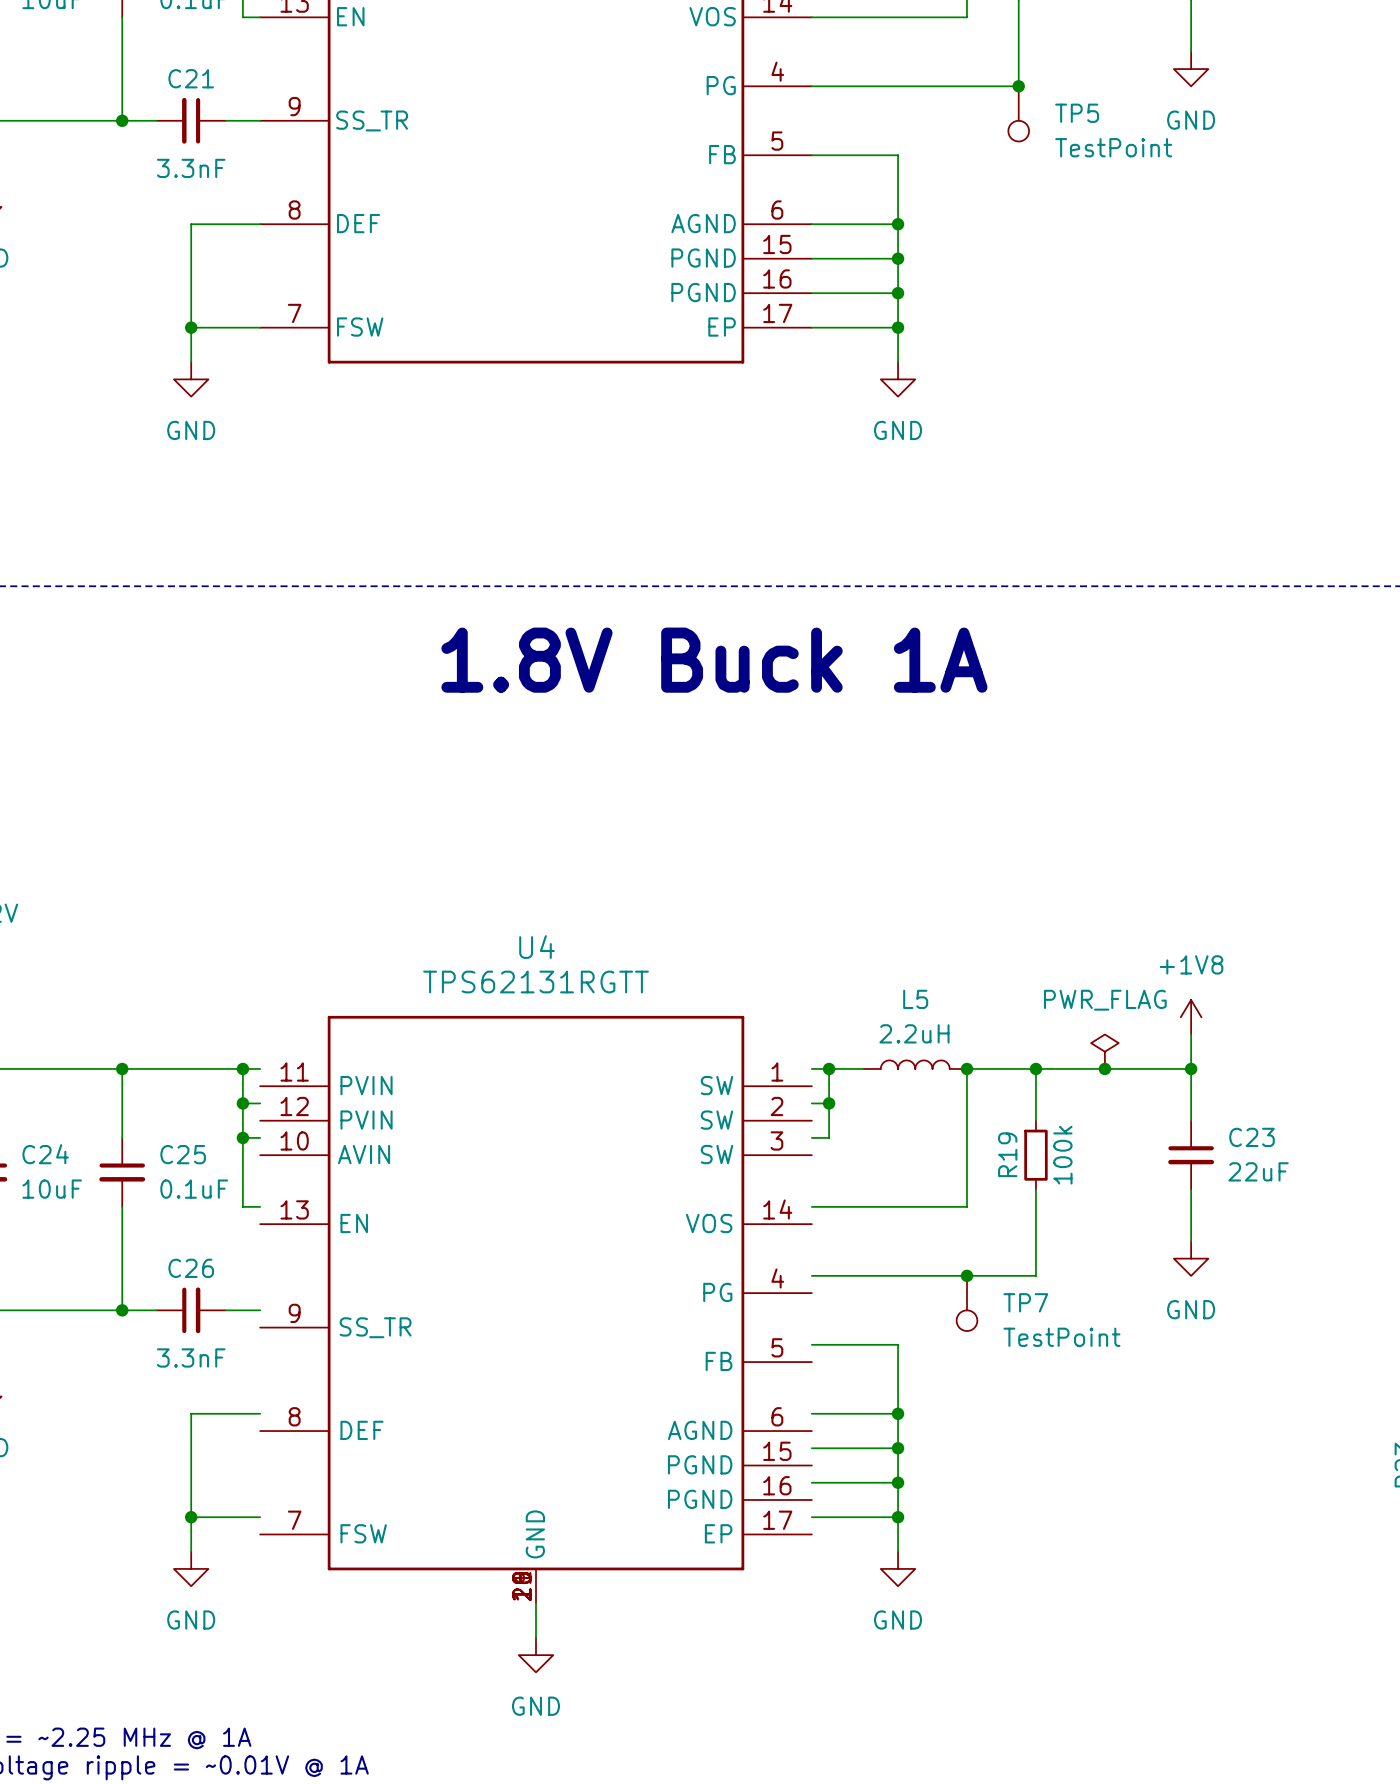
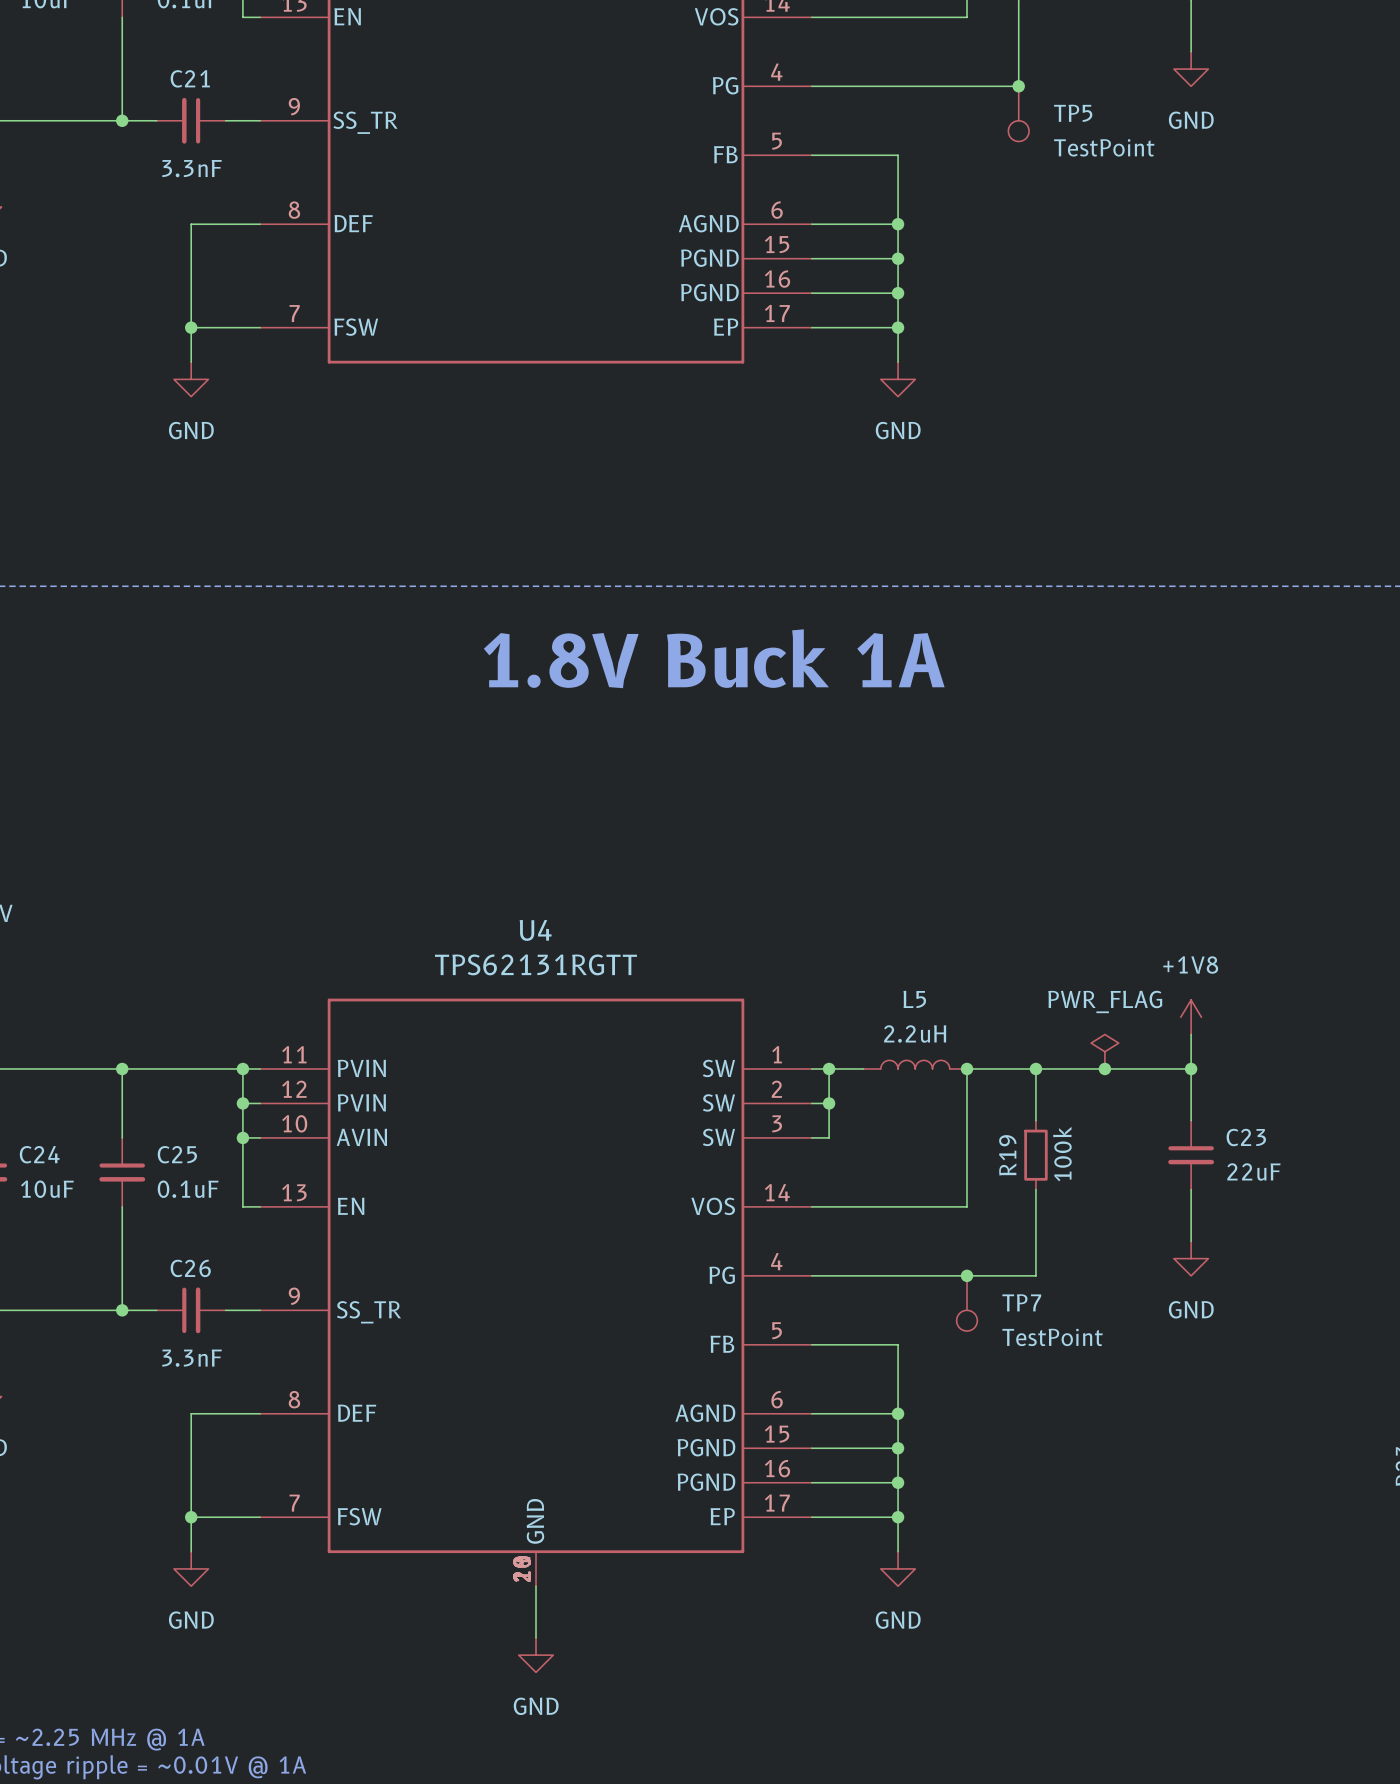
U4 position: (536, 1309) -> (536, 1292)

